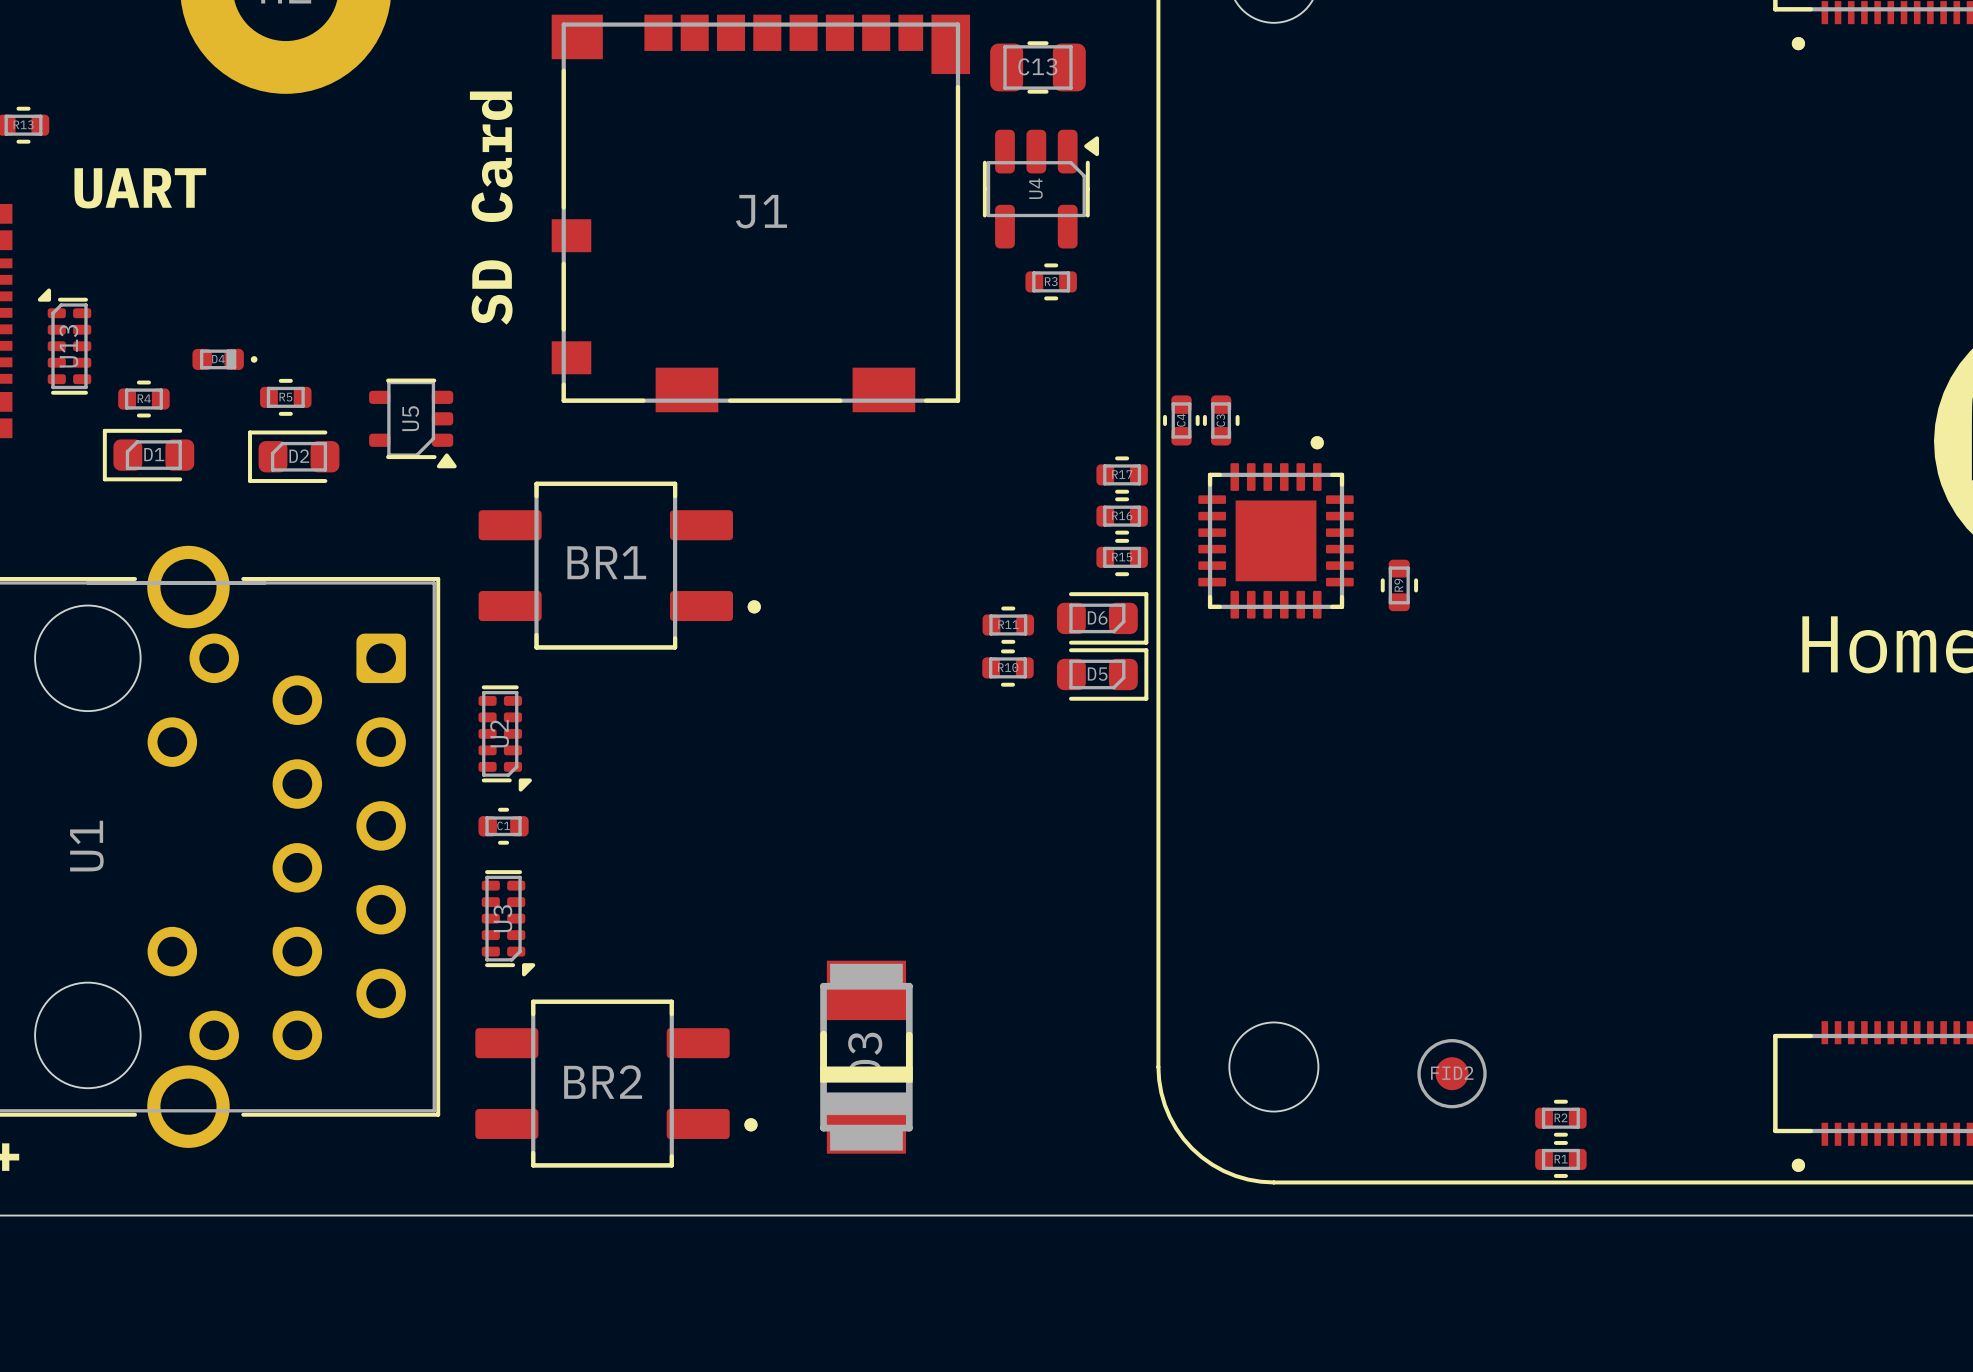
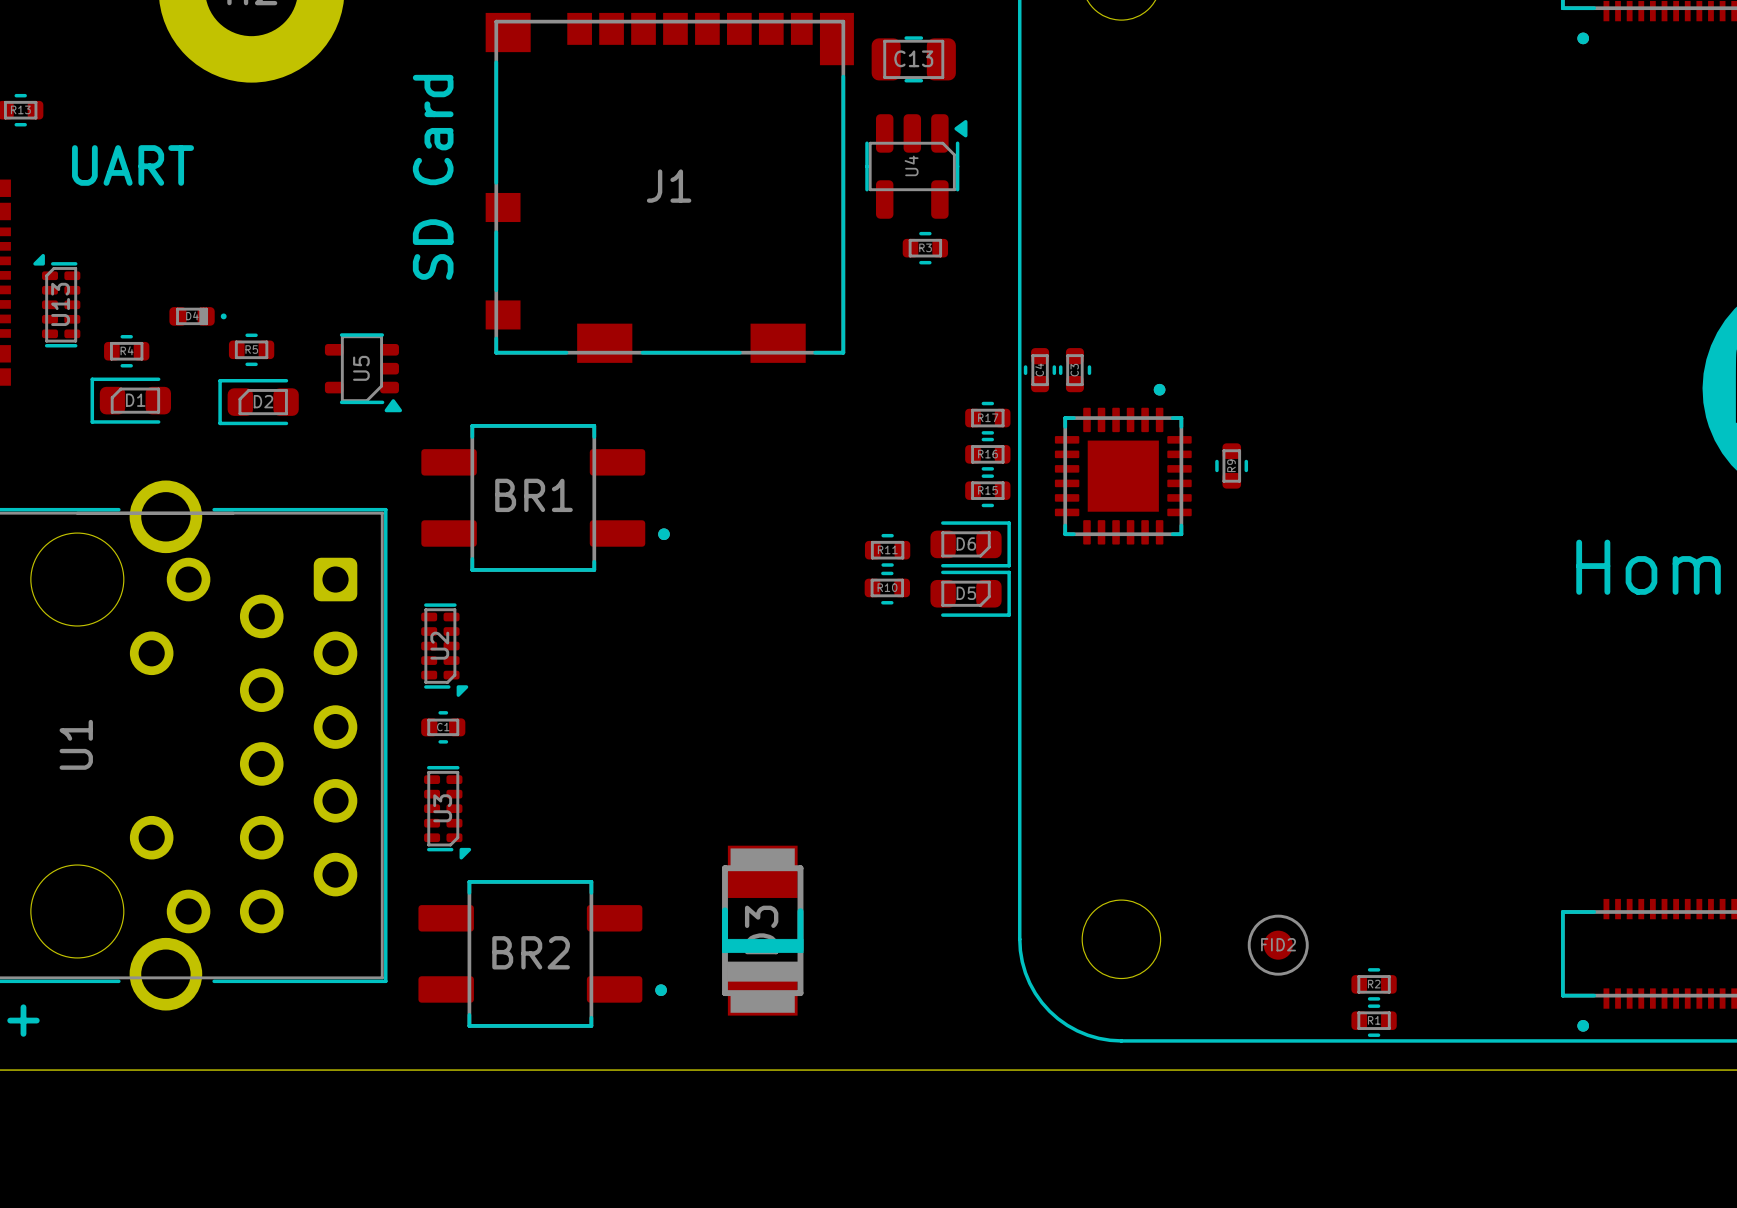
R9 position: (1399, 585) -> (1231, 465)

